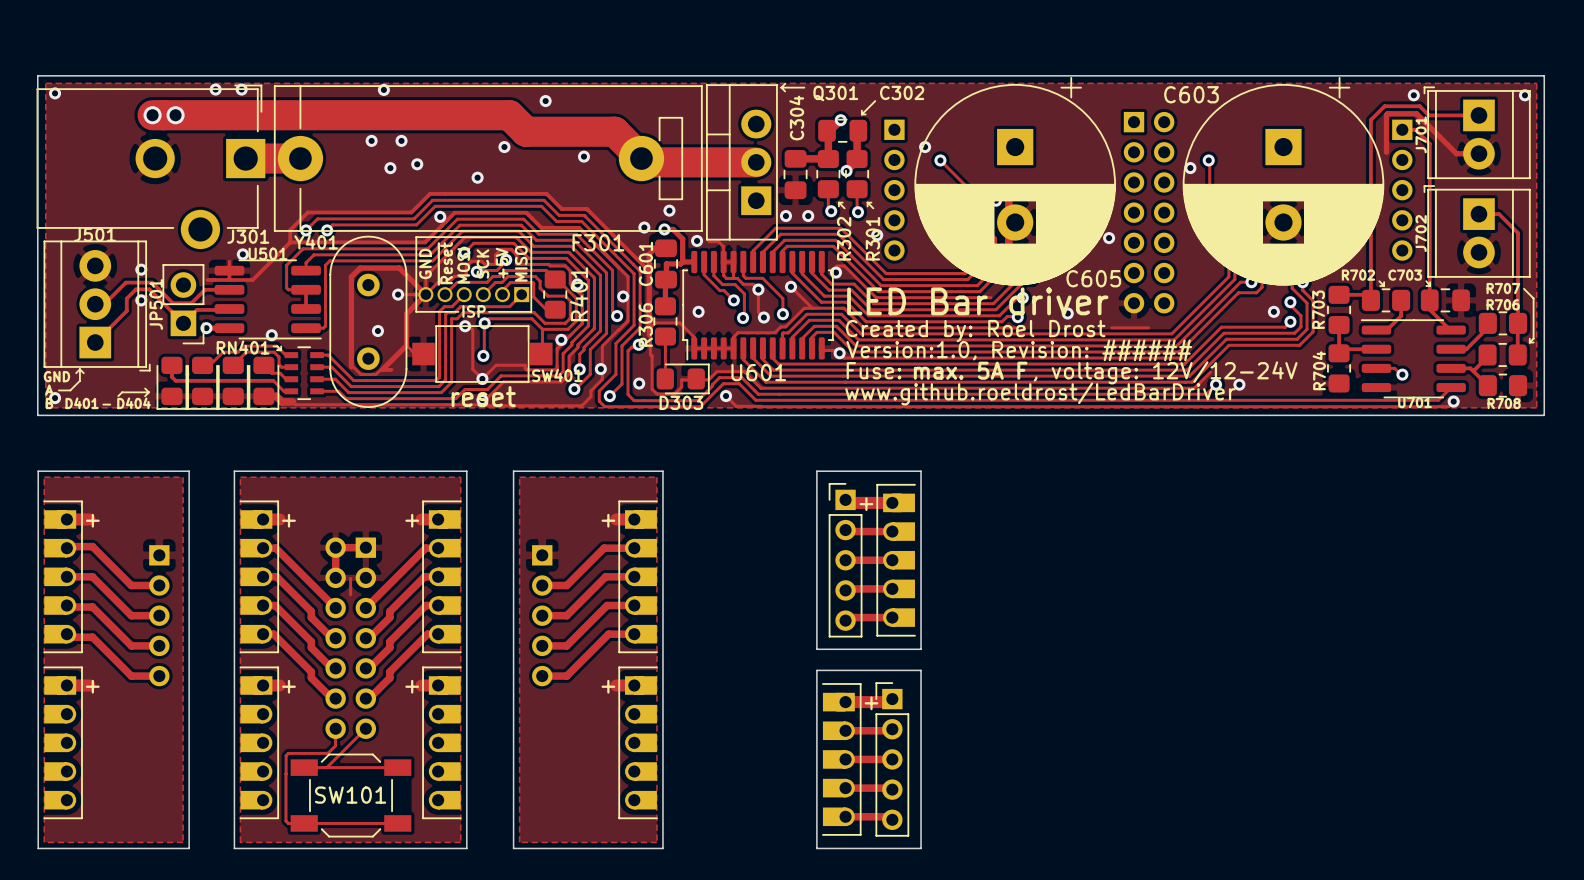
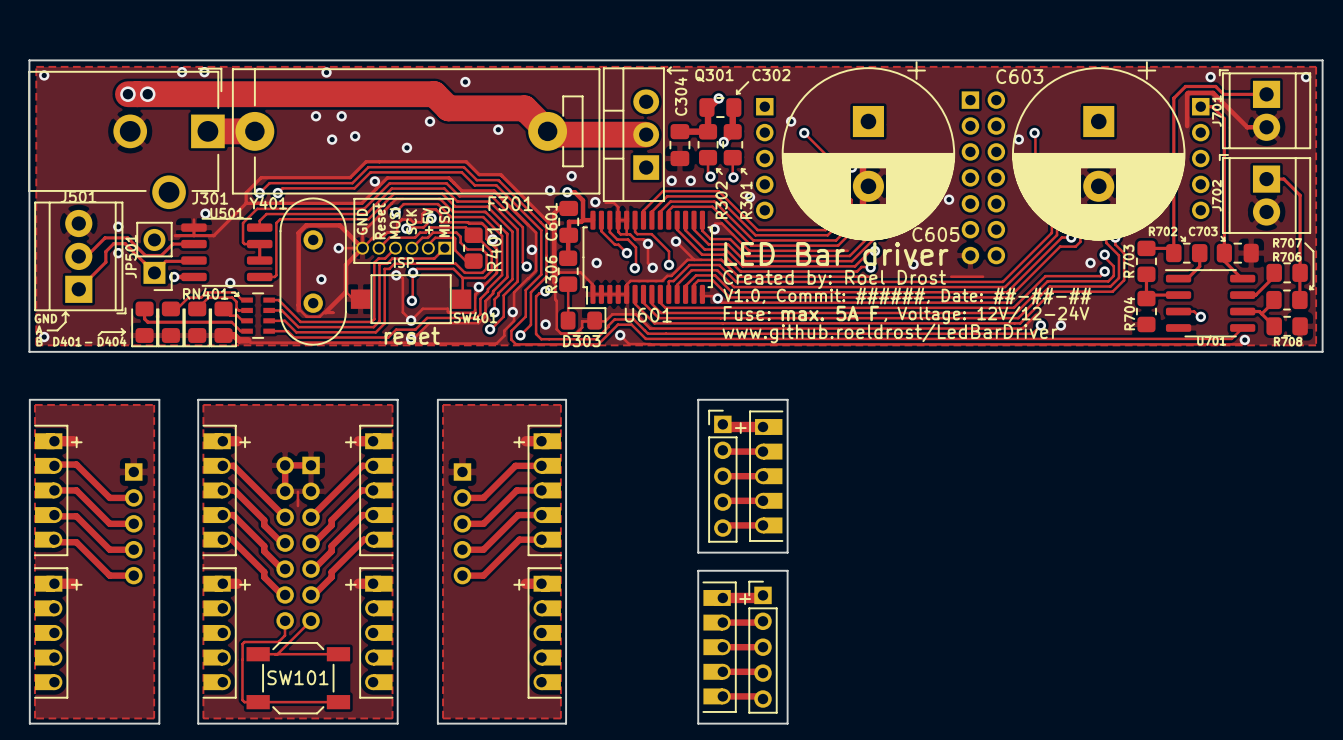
text: Version:1.0, Revision: ###### (1019, 350) -> V1.0, Commit: ######, Date: ##-##-## (907, 296)
text: , voltage: 12V/12-24V (1165, 372) -> , Voltage: 12V/12-24V (986, 315)

